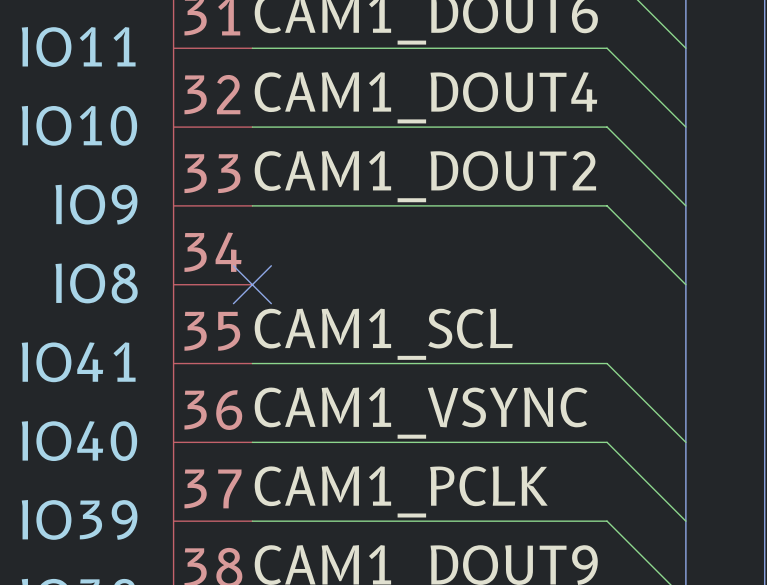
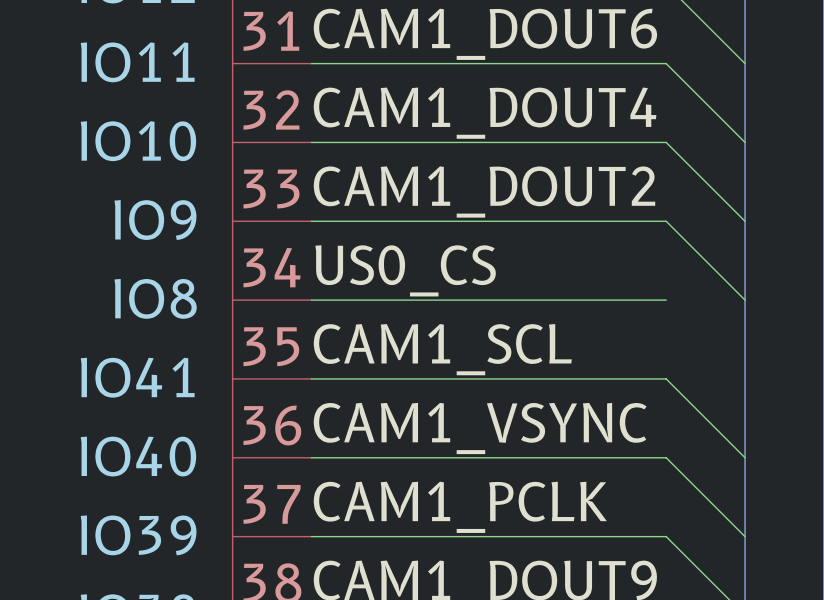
label: none -> US0_CS (405, 270)
wire: none -> (311, 300) (666, 300)
no-connect mark: (252, 284) -> none

